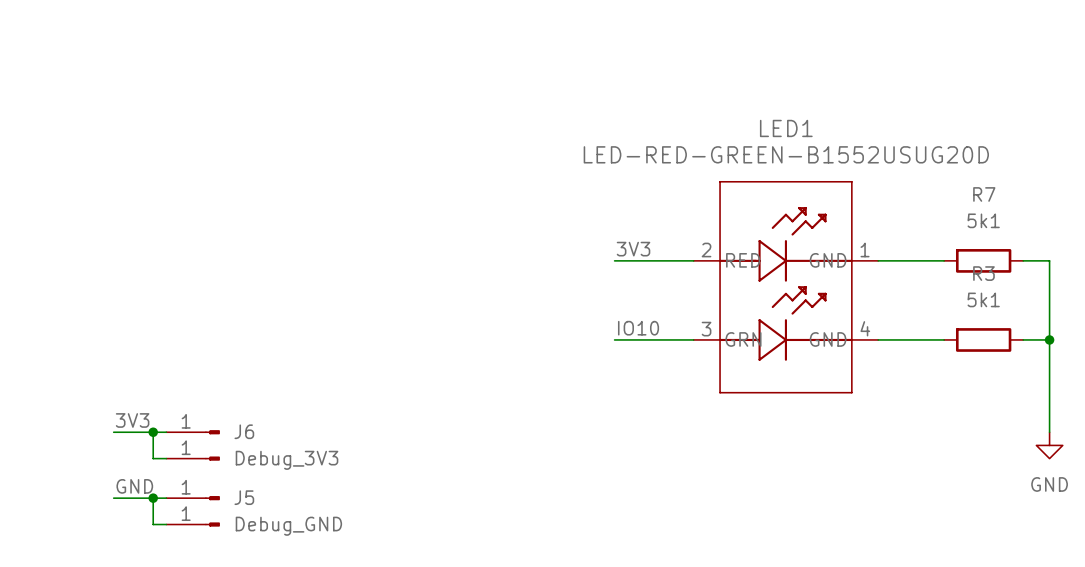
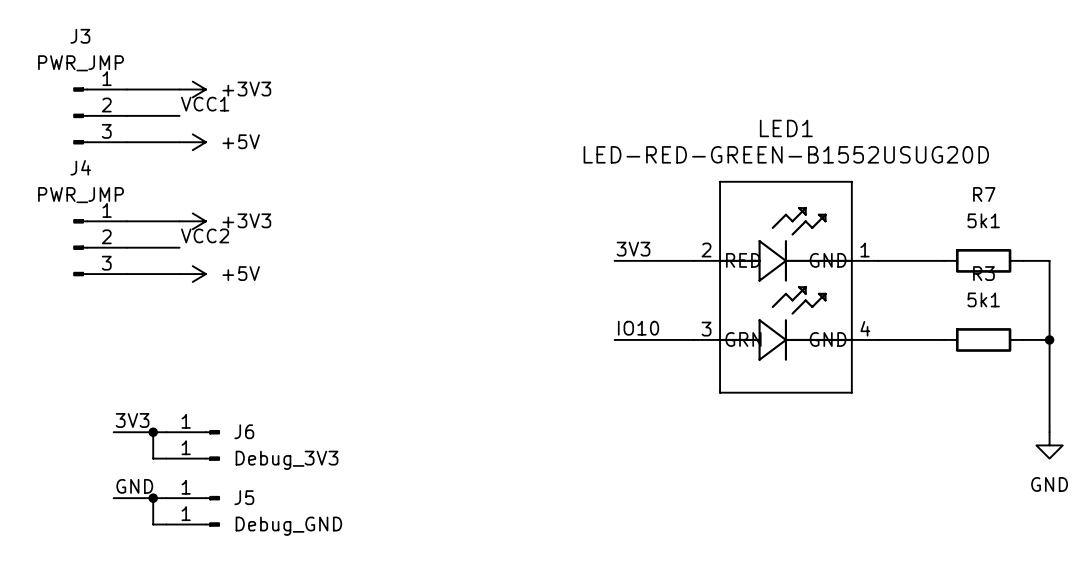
wire: none -> (126, 89) (179, 89)
power symbol: none -> +3V3 (192, 89)
label: none -> VCC1 (205, 104)
J3: none -> PWR_JMP (100, 115)
wire: none -> (126, 115) (179, 115)
wire: none -> (126, 142) (179, 142)
power symbol: none -> +5V (192, 142)
wire: none -> (126, 221) (179, 221)
power symbol: none -> +3V3 (192, 221)
label: none -> VCC2 (205, 235)
J4: none -> PWR_JMP (100, 247)
wire: none -> (126, 247) (179, 247)
wire: none -> (126, 274) (179, 274)
power symbol: none -> +5V (192, 274)

